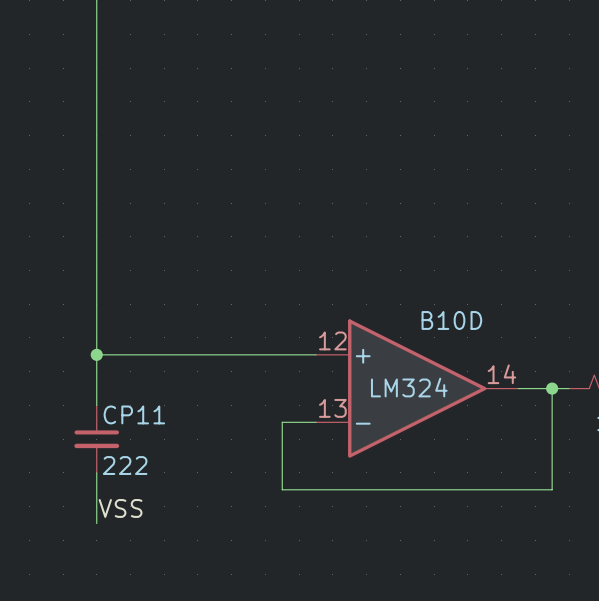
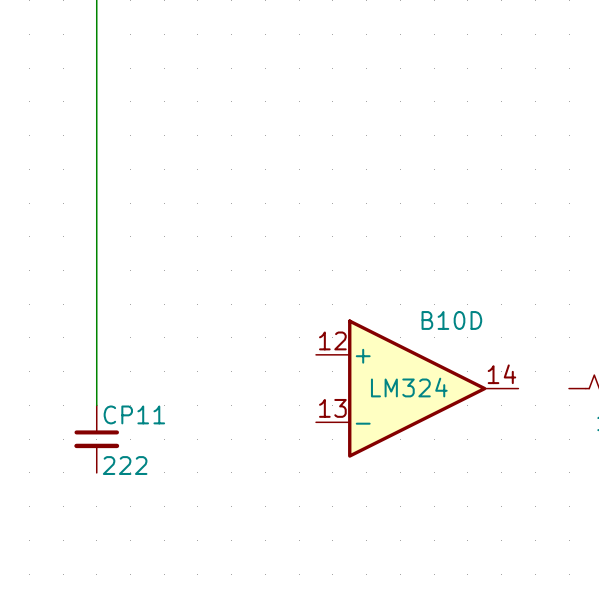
wire: (96, 354) (316, 354) -> none
junction: (96, 354) -> none
wire: (518, 388) (569, 388) -> none
wire: (552, 388) (552, 489) (282, 489) (282, 422) (316, 422) -> none
junction: (552, 388) -> none
wire: (96, 472) (96, 523) -> none
label: VSS (120, 508) -> none

